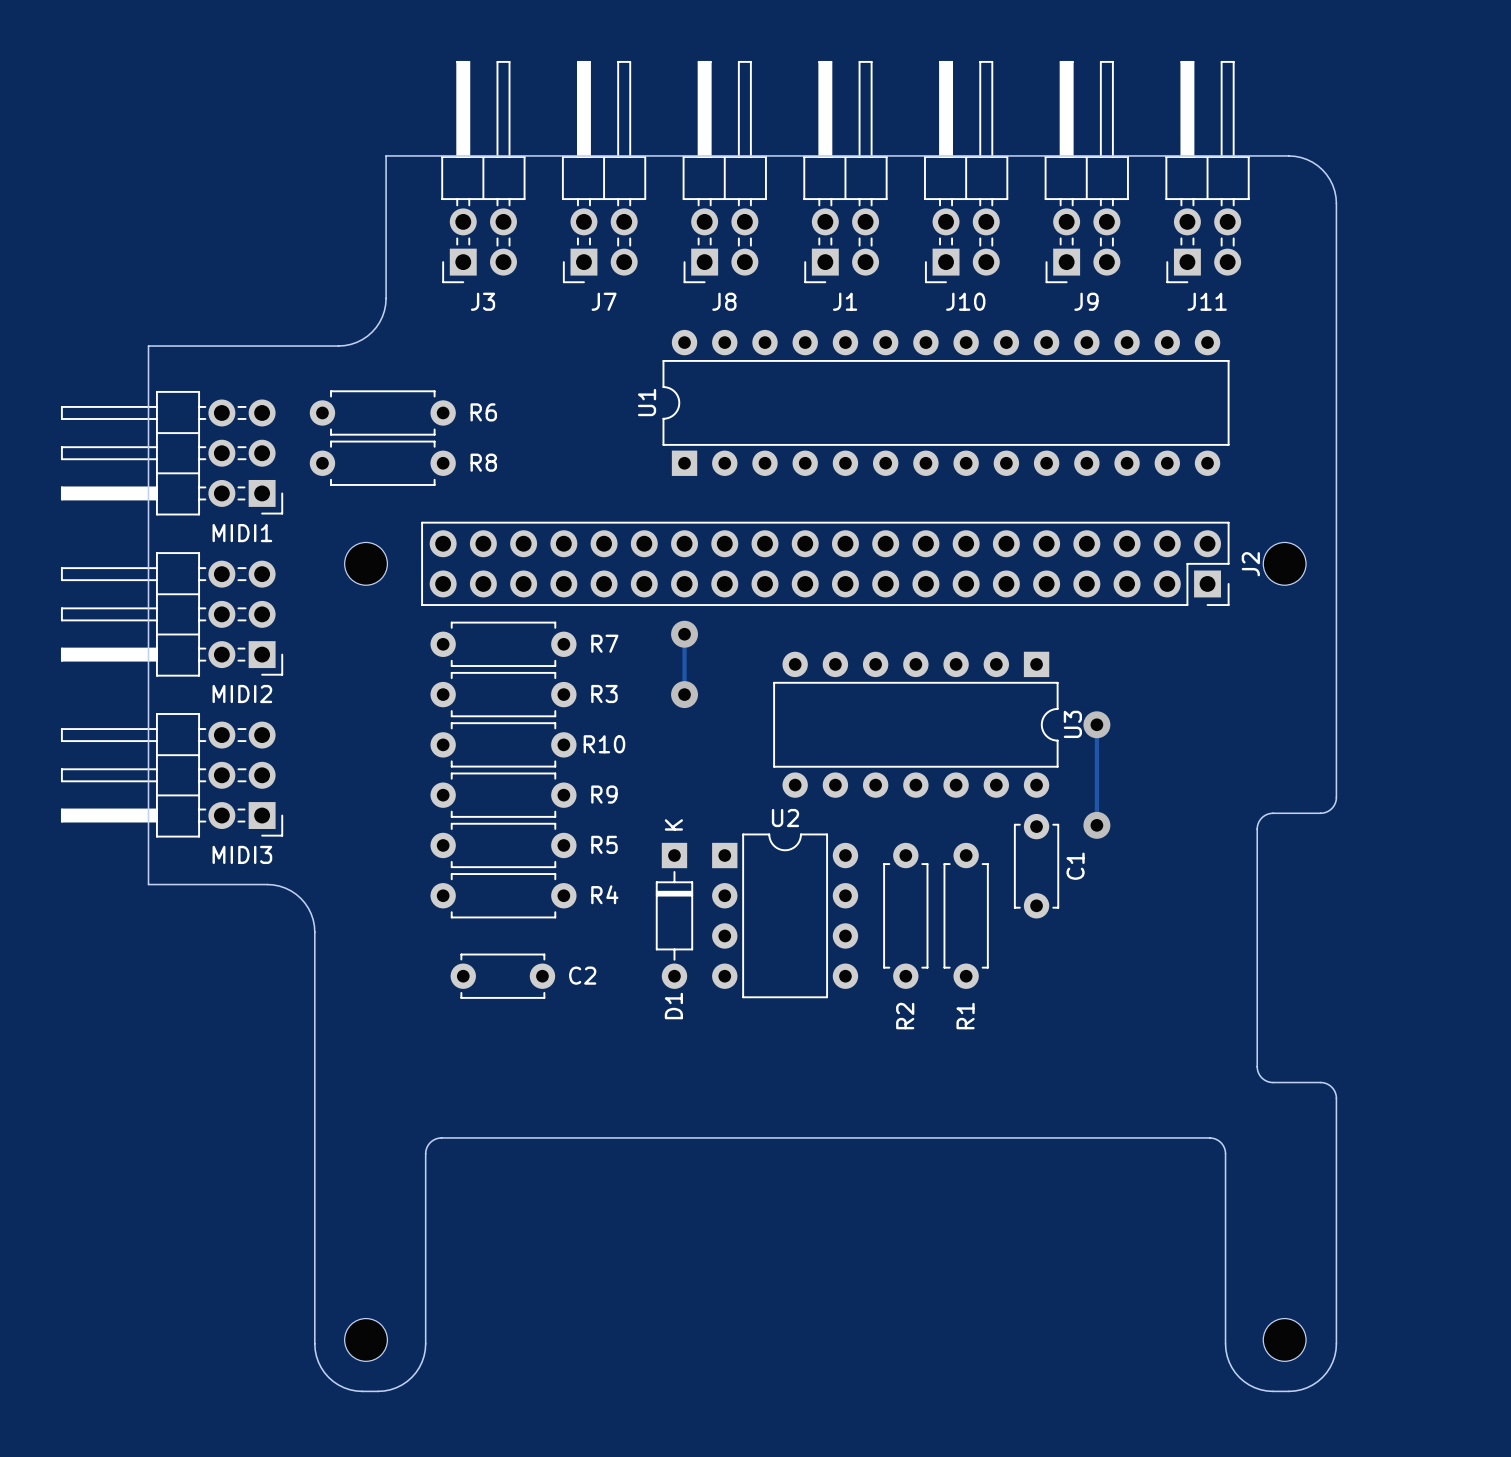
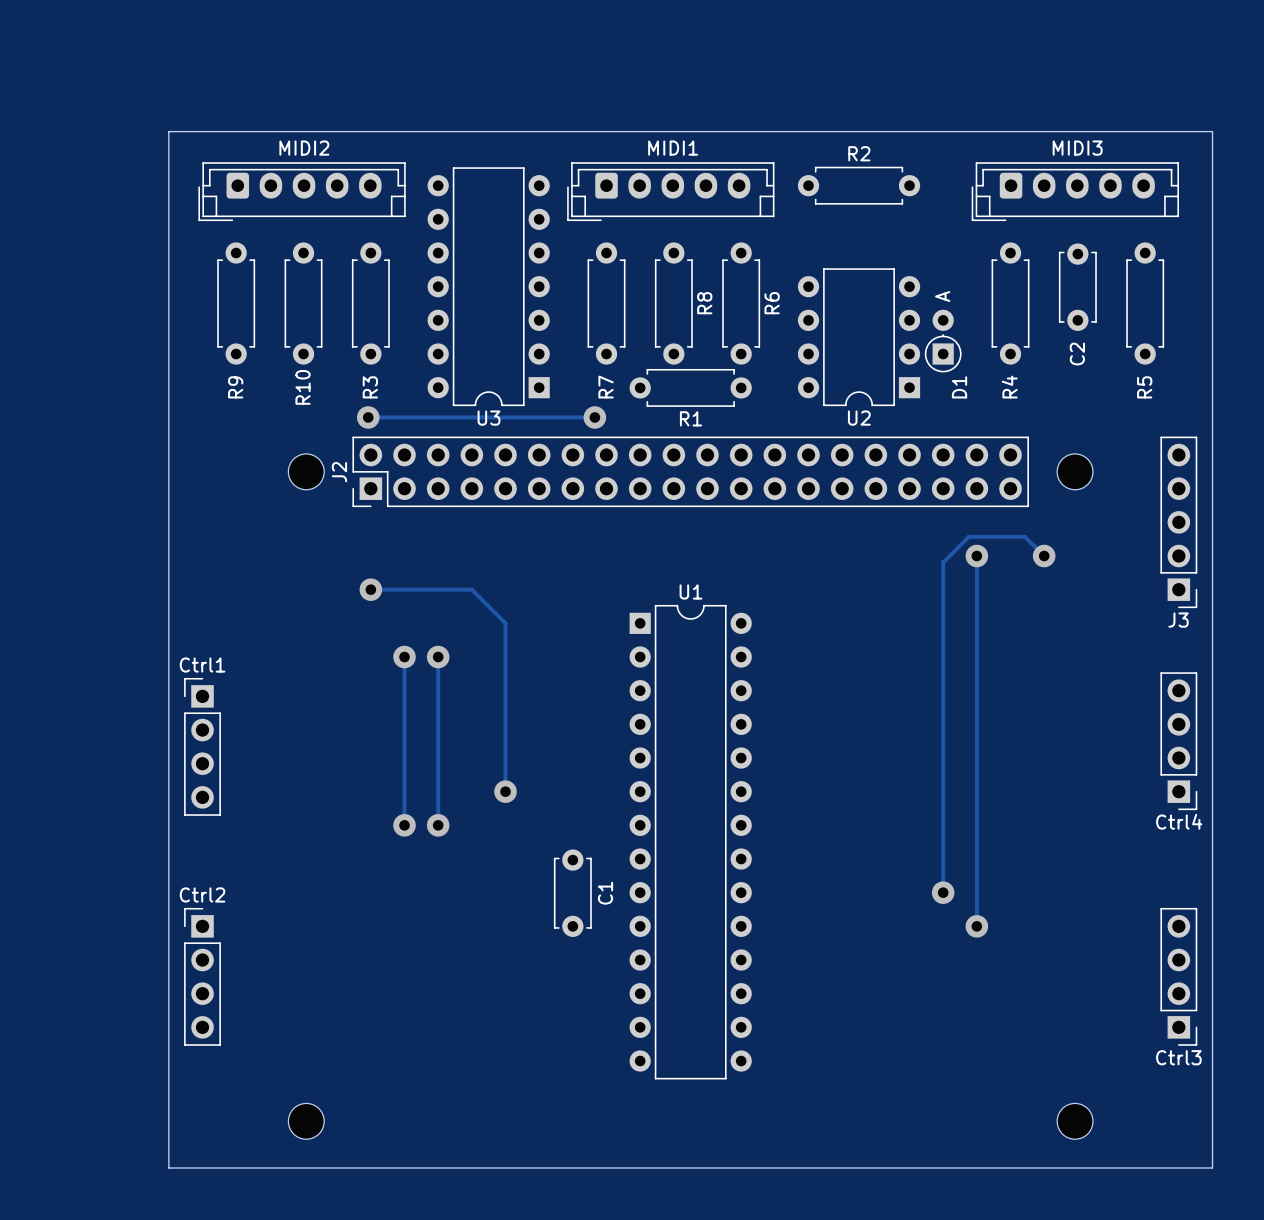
J3 footprint: [441, 60, 526, 284] -> [1160, 436, 1198, 609]
board edge: (386, 155) (1288, 155) (1301, 157) (1312, 162) (1326, 174) (1332, 185) (1336, 203) (1336, 799) (1331, 808) (1324, 812) (1267, 814) (1260, 819) (1257, 829) (1258, 1071) (1263, 1079) (1271, 1082) (1325, 1083) (1332, 1088) (1336, 1096) (1336, 1343) (1332, 1362) (1326, 1372) (1317, 1381) (1307, 1387) (1295, 1390) (1260, 1389) (1249, 1385) (1239, 1377) (1229, 1362) (1225, 1343) (1225, 1152) (1219, 1141) (1209, 1137) (437, 1138) (430, 1142) (425, 1152) (425, 1343) (422, 1362) (415, 1372) (407, 1381) (396, 1387) (384, 1390) (350, 1389) (333, 1381) (324, 1372) (316, 1356) (314, 1343) (314, 932) (311, 913) (304, 903) (296, 894) (285, 888) (273, 884) (148, 884) (148, 346) (338, 346) (356, 342) (367, 336) (379, 322) (385, 304) (386, 155) -> (168, 131) (168, 1168) (1212, 1168) (1212, 131) (168, 131)
J7: (604, 172) -> none
J8: (724, 172) -> none
J1: (845, 172) -> none
J10: (966, 172) -> none
J9: (1086, 172) -> none
J11: (1207, 172) -> none
MIDI1 footprint: [60, 390, 284, 516] -> [567, 162, 775, 222]
U1 rotation: 0° (946, 402) -> 90° clockwise (690, 842)
U1 position: (946, 402) -> (690, 842)
R6 rotation: 0° (382, 412) -> 90° clockwise (741, 303)
R6 position: (382, 412) -> (741, 303)
R6 name position: R6 (483, 412) -> R6 (772, 303)
R8 name position: R8 (483, 462) -> R8 (704, 303)
R8 rotation: 0° (382, 463) -> 90° clockwise (673, 303)
R8 position: (382, 463) -> (673, 303)
track: none -> (368, 417) (594, 417)
via: none -> (368, 417)
via: none -> (594, 417)
J2 footprint: [421, 521, 1230, 606] -> [352, 436, 1029, 508]
MIDI1 name position: MIDI1 (242, 533) -> MIDI1 (673, 148)
MIDI2 footprint: [60, 552, 284, 677] -> [198, 162, 406, 222]
J2 name position: J2 (1250, 564) -> J2 (339, 472)
track: (684, 634) (684, 694) -> none
via: (684, 634) -> none
R7 rotation: 0° (503, 644) -> 90° clockwise (606, 303)
R7 position: (503, 644) -> (606, 303)
track: none -> (976, 556) (976, 926)
via: none -> (976, 556)
track: none -> (1044, 556) (1024, 536) (968, 536) (943, 562) (943, 892)
via: none -> (1044, 556)
MIDI2 name position: MIDI2 (242, 694) -> MIDI2 (304, 148)
R3 rotation: 0° (503, 694) -> 90° clockwise (370, 303)
R3 position: (503, 694) -> (370, 303)
via: (684, 694) -> none
track: none -> (370, 589) (471, 589) (505, 623) (505, 791)
via: none -> (370, 589)
MIDI3 footprint: [60, 713, 284, 838] -> [971, 162, 1179, 222]
U3 rotation: 0° (915, 724) -> 90° clockwise (488, 286)
U3 position: (915, 724) -> (488, 286)
track: (1096, 724) (1096, 825) -> none
via: (1096, 724) -> none
R10 rotation: 0° (503, 744) -> 90° clockwise (303, 303)
R10 position: (503, 744) -> (303, 303)
track: none -> (404, 657) (404, 825)
via: none -> (404, 657)
track: none -> (438, 657) (438, 825)
via: none -> (438, 657)
R9 rotation: 0° (503, 795) -> 90° clockwise (236, 303)
R9 position: (503, 795) -> (236, 303)
via: (1096, 825) -> none
D1 footprint: [655, 842, 694, 989] -> [924, 309, 962, 373]
R5 rotation: 0° (503, 845) -> 90° clockwise (1145, 303)
R5 position: (503, 845) -> (1145, 303)
MIDI3 name position: MIDI3 (242, 854) -> MIDI3 (1077, 148)
C1 position: (1036, 866) -> (572, 893)
Ctrl4: none -> (1178, 741)
Ctrl1: none -> (202, 746)
R4 rotation: 0° (503, 895) -> 90° clockwise (1010, 303)
R4 position: (503, 895) -> (1010, 303)
U2 rotation: 0° (785, 915) -> 180° (859, 337)
U2 position: (785, 915) -> (859, 337)
R2 rotation: 0° (905, 915) -> 90° clockwise (859, 185)
R2 position: (905, 915) -> (859, 185)
R1 rotation: 0° (966, 915) -> 90° clockwise (690, 387)
R1 position: (966, 915) -> (690, 387)
via: none -> (505, 791)
C2 rotation: 0° (502, 976) -> 90° clockwise (1077, 287)
C2 position: (502, 976) -> (1077, 287)
via: none -> (404, 825)
via: none -> (438, 825)
D1 name position: D1 (673, 1006) -> D1 (959, 387)
R2 name position: R2 (905, 1016) -> R2 (859, 153)
R1 name position: R1 (965, 1016) -> R1 (691, 418)
via: none -> (943, 892)
via: none -> (976, 926)
Ctrl2: none -> (202, 976)
Ctrl3: none -> (1178, 976)

